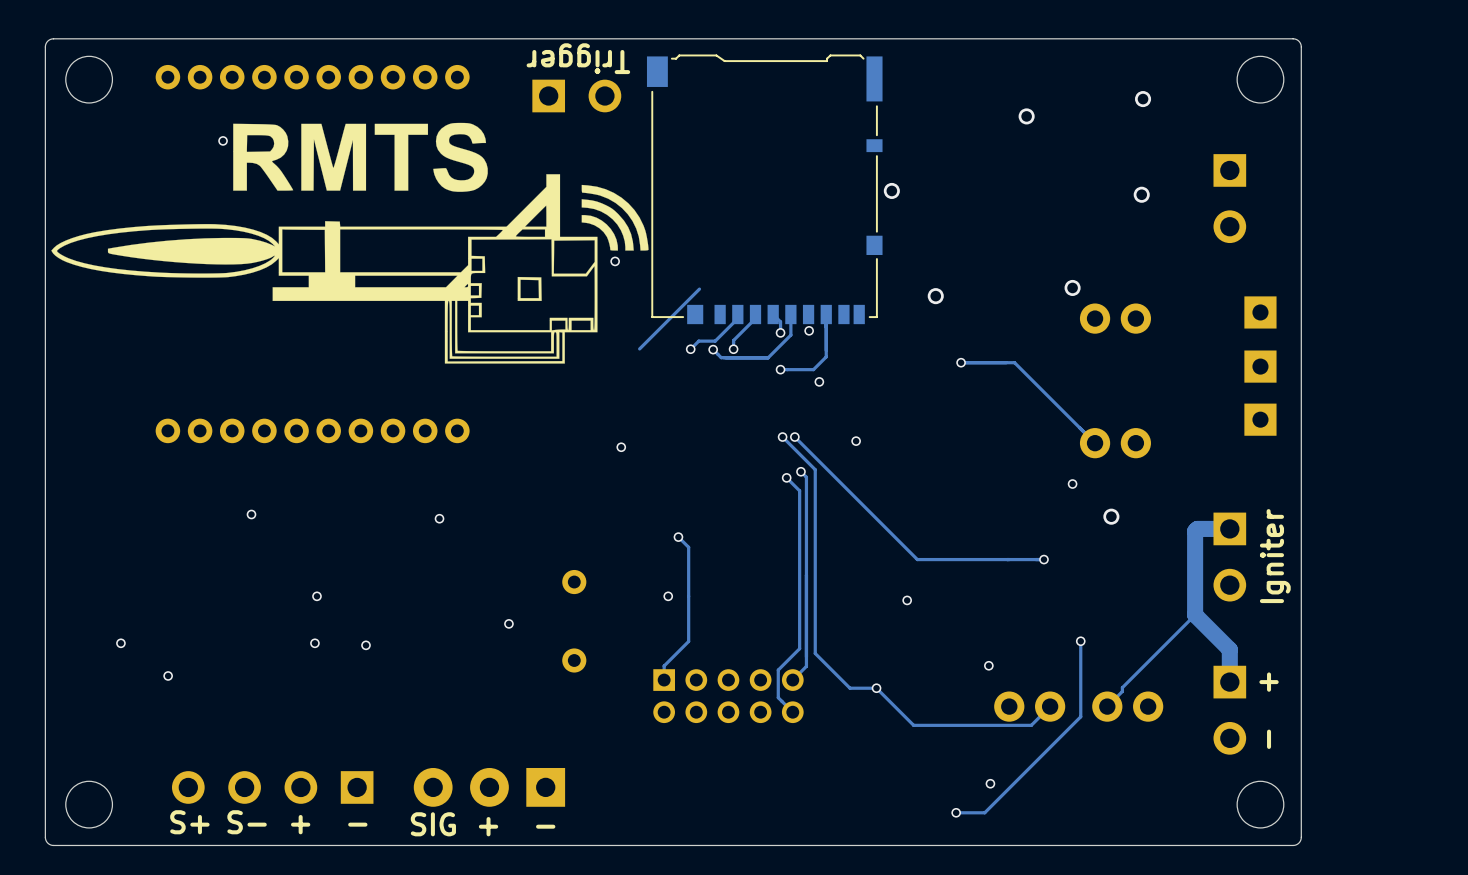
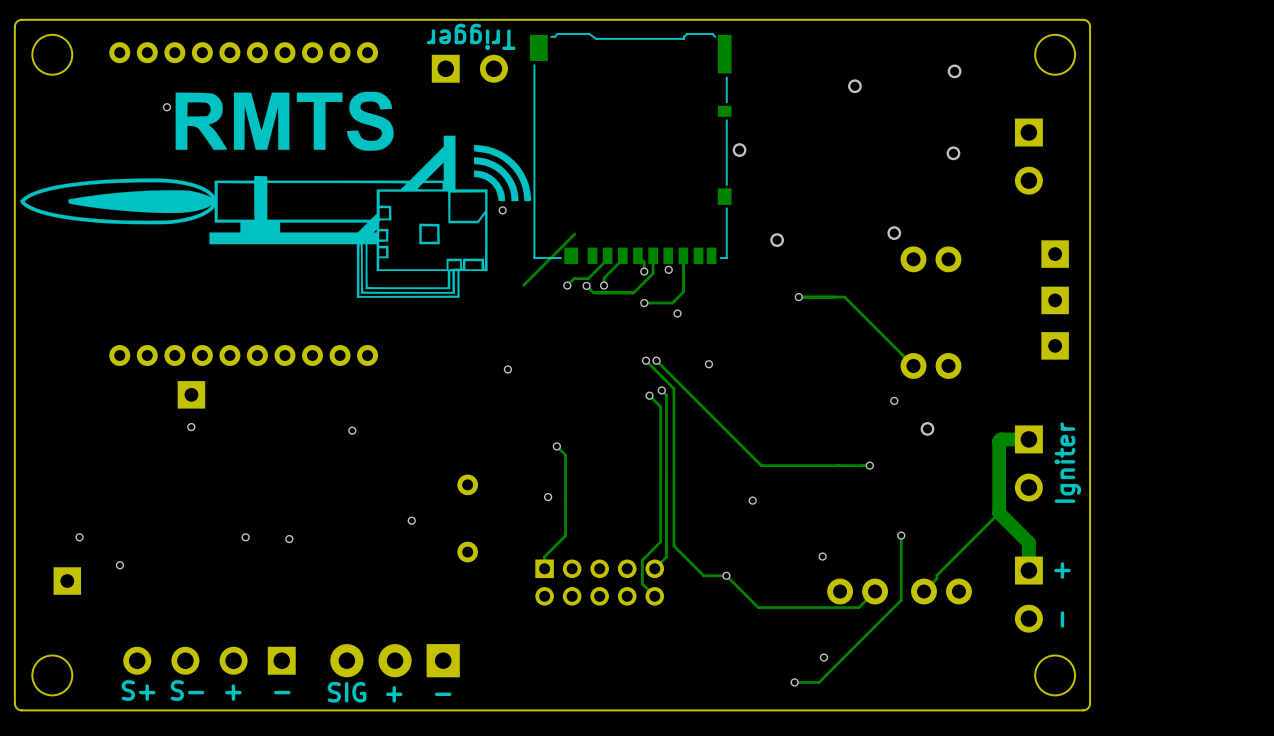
part: none -> (191, 394)
via: (316, 596) -> none
part: none -> (67, 581)

